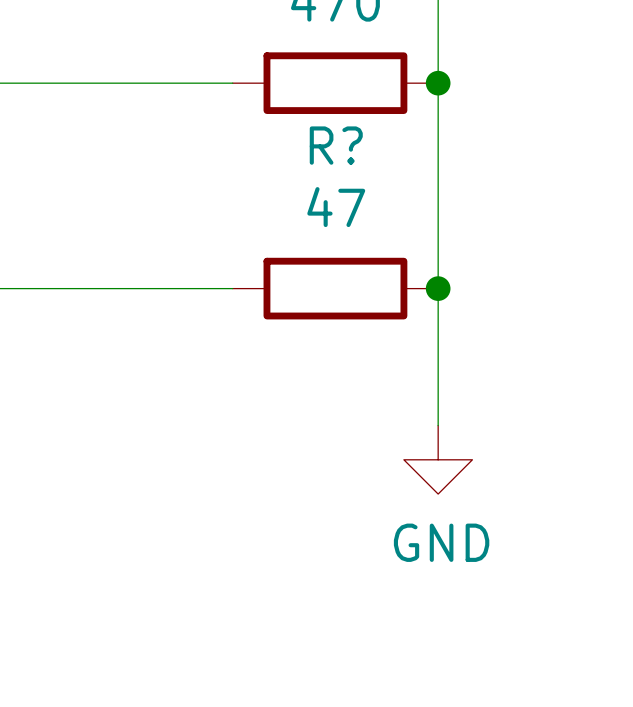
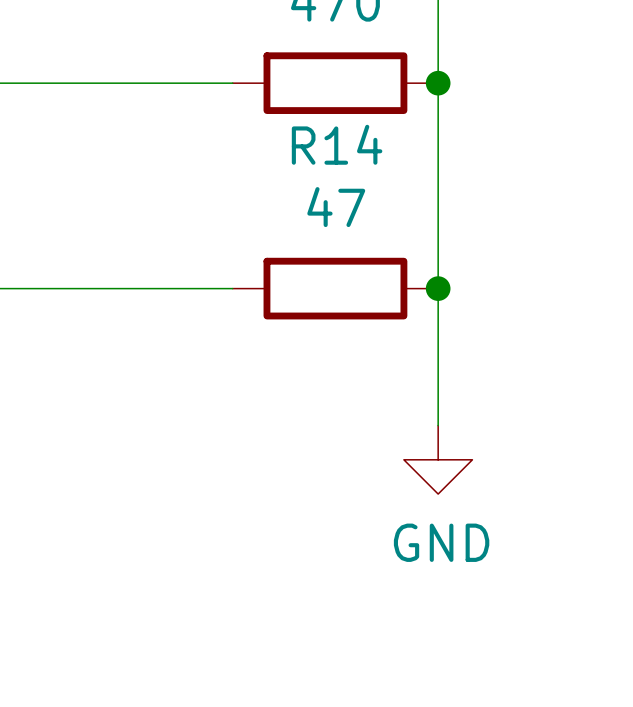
R? name: R? (336, 145) -> R14 (337, 144)

